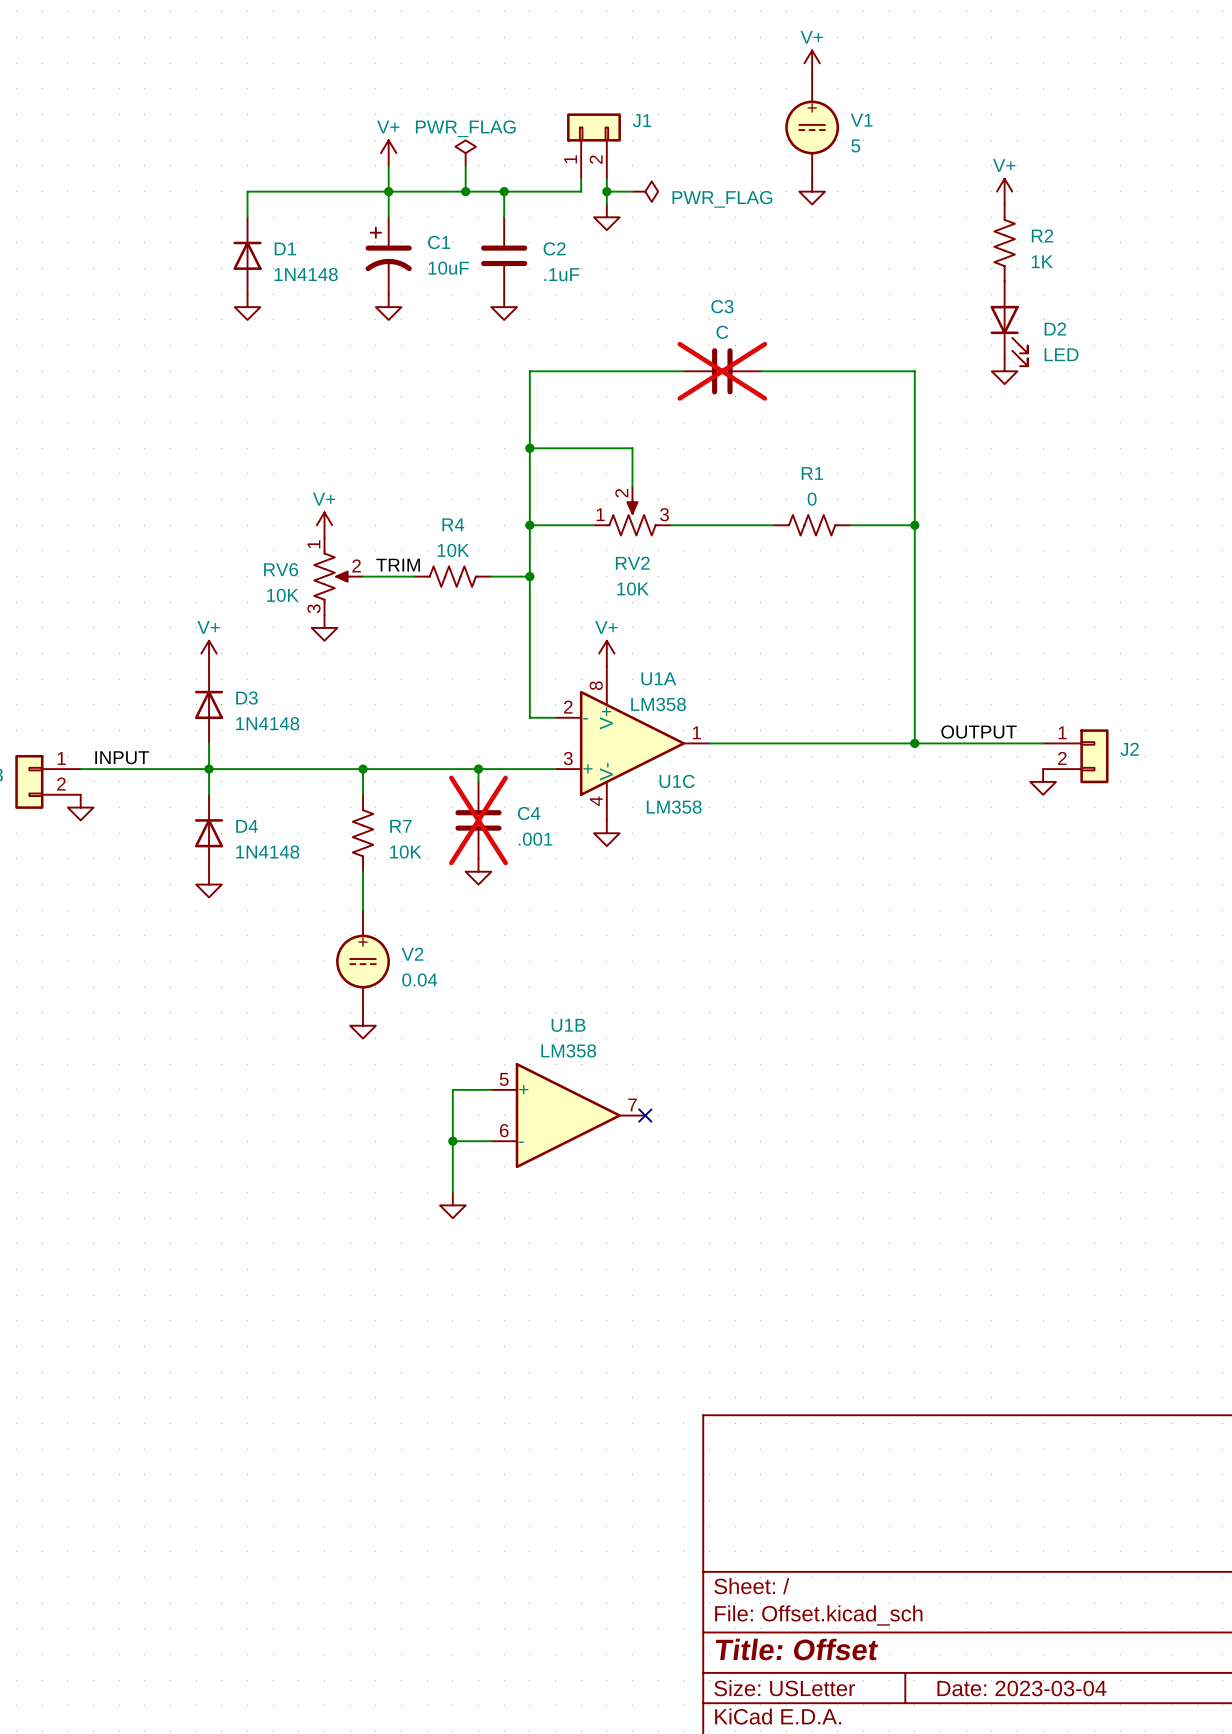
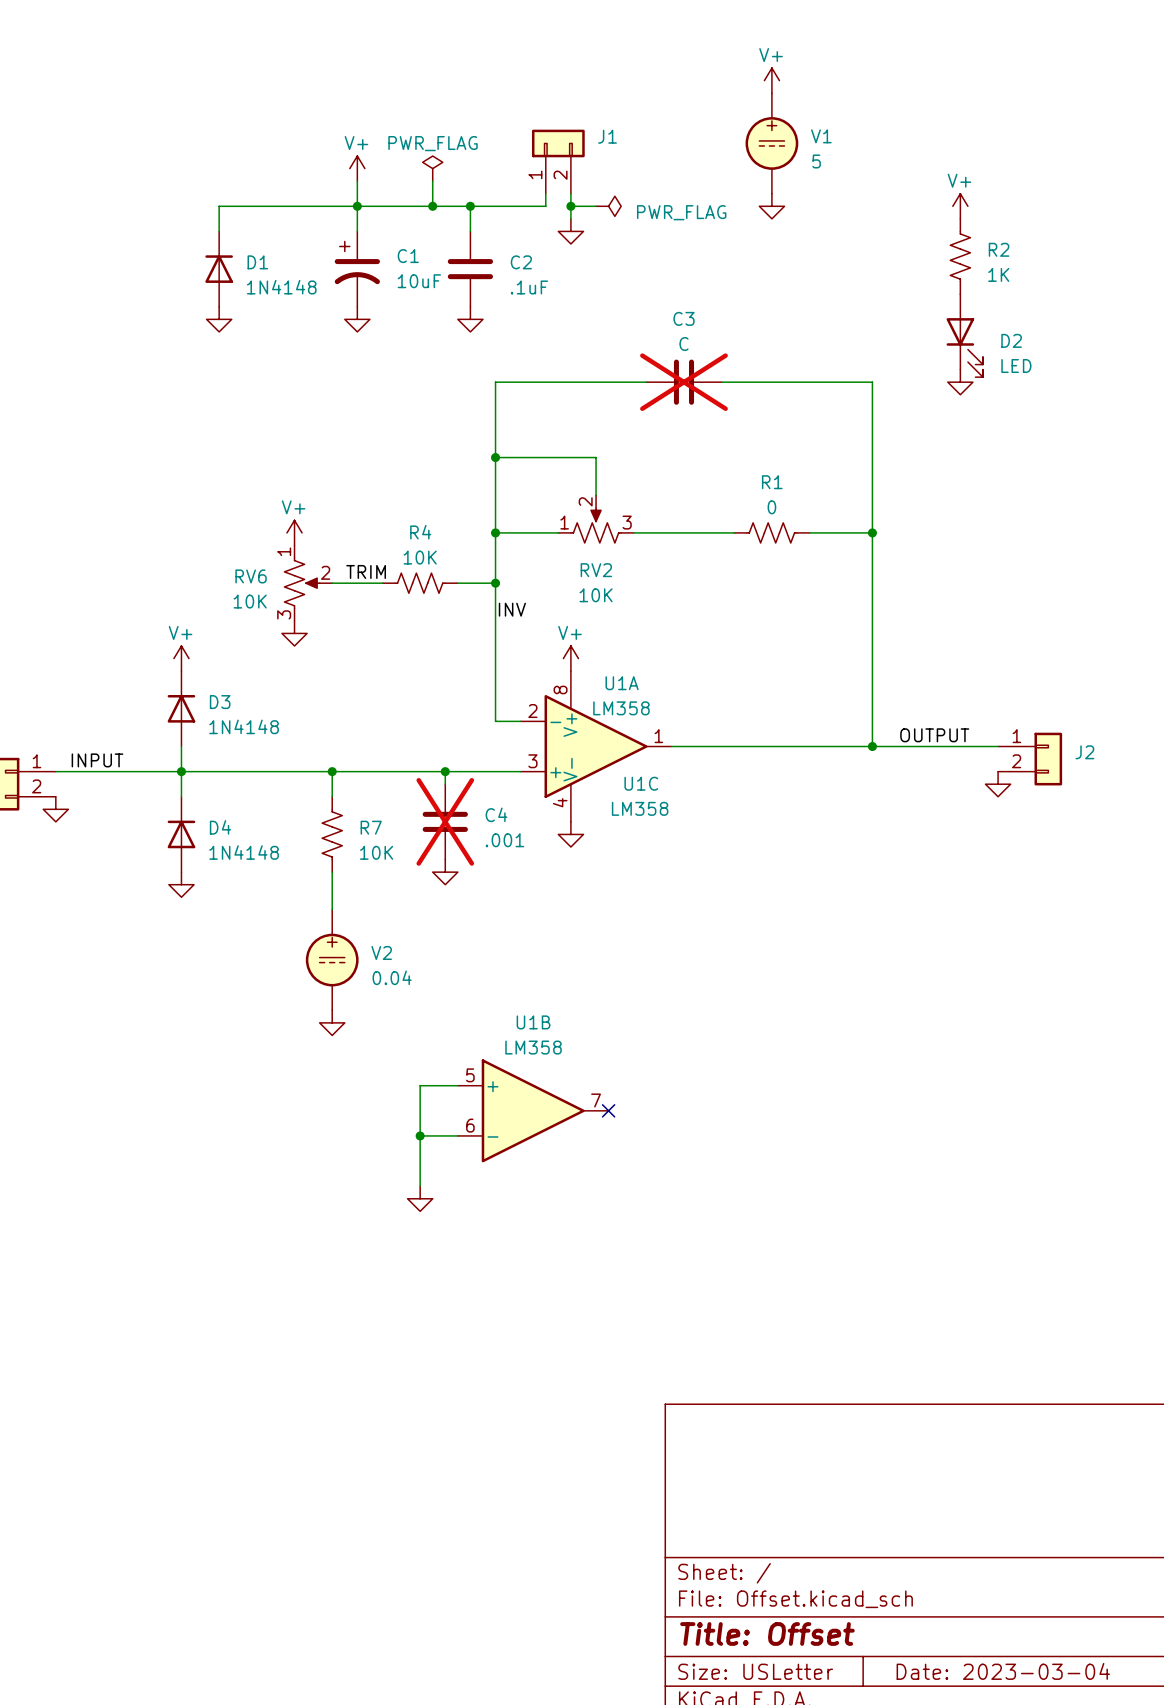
label: none -> INV (512, 609)

